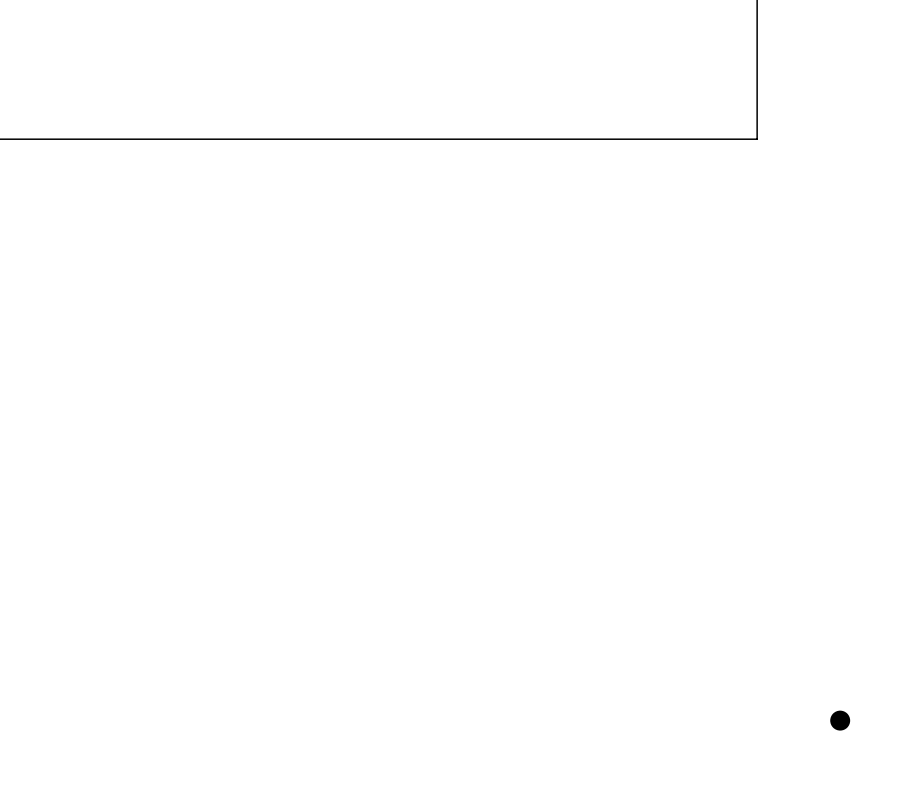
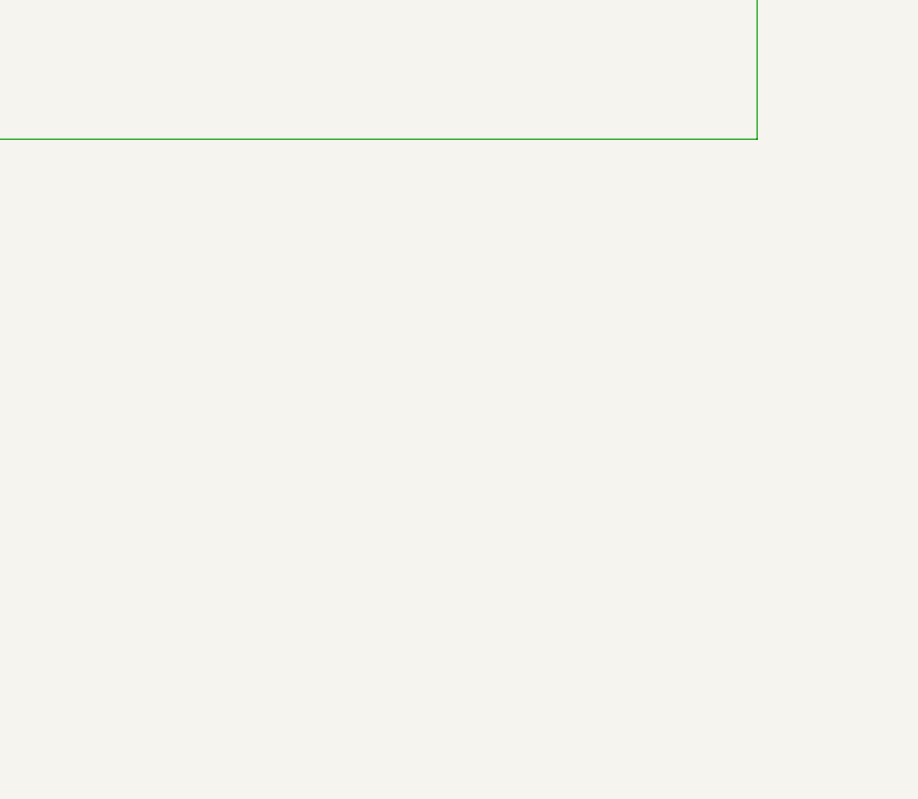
junction: (840, 720) -> none

